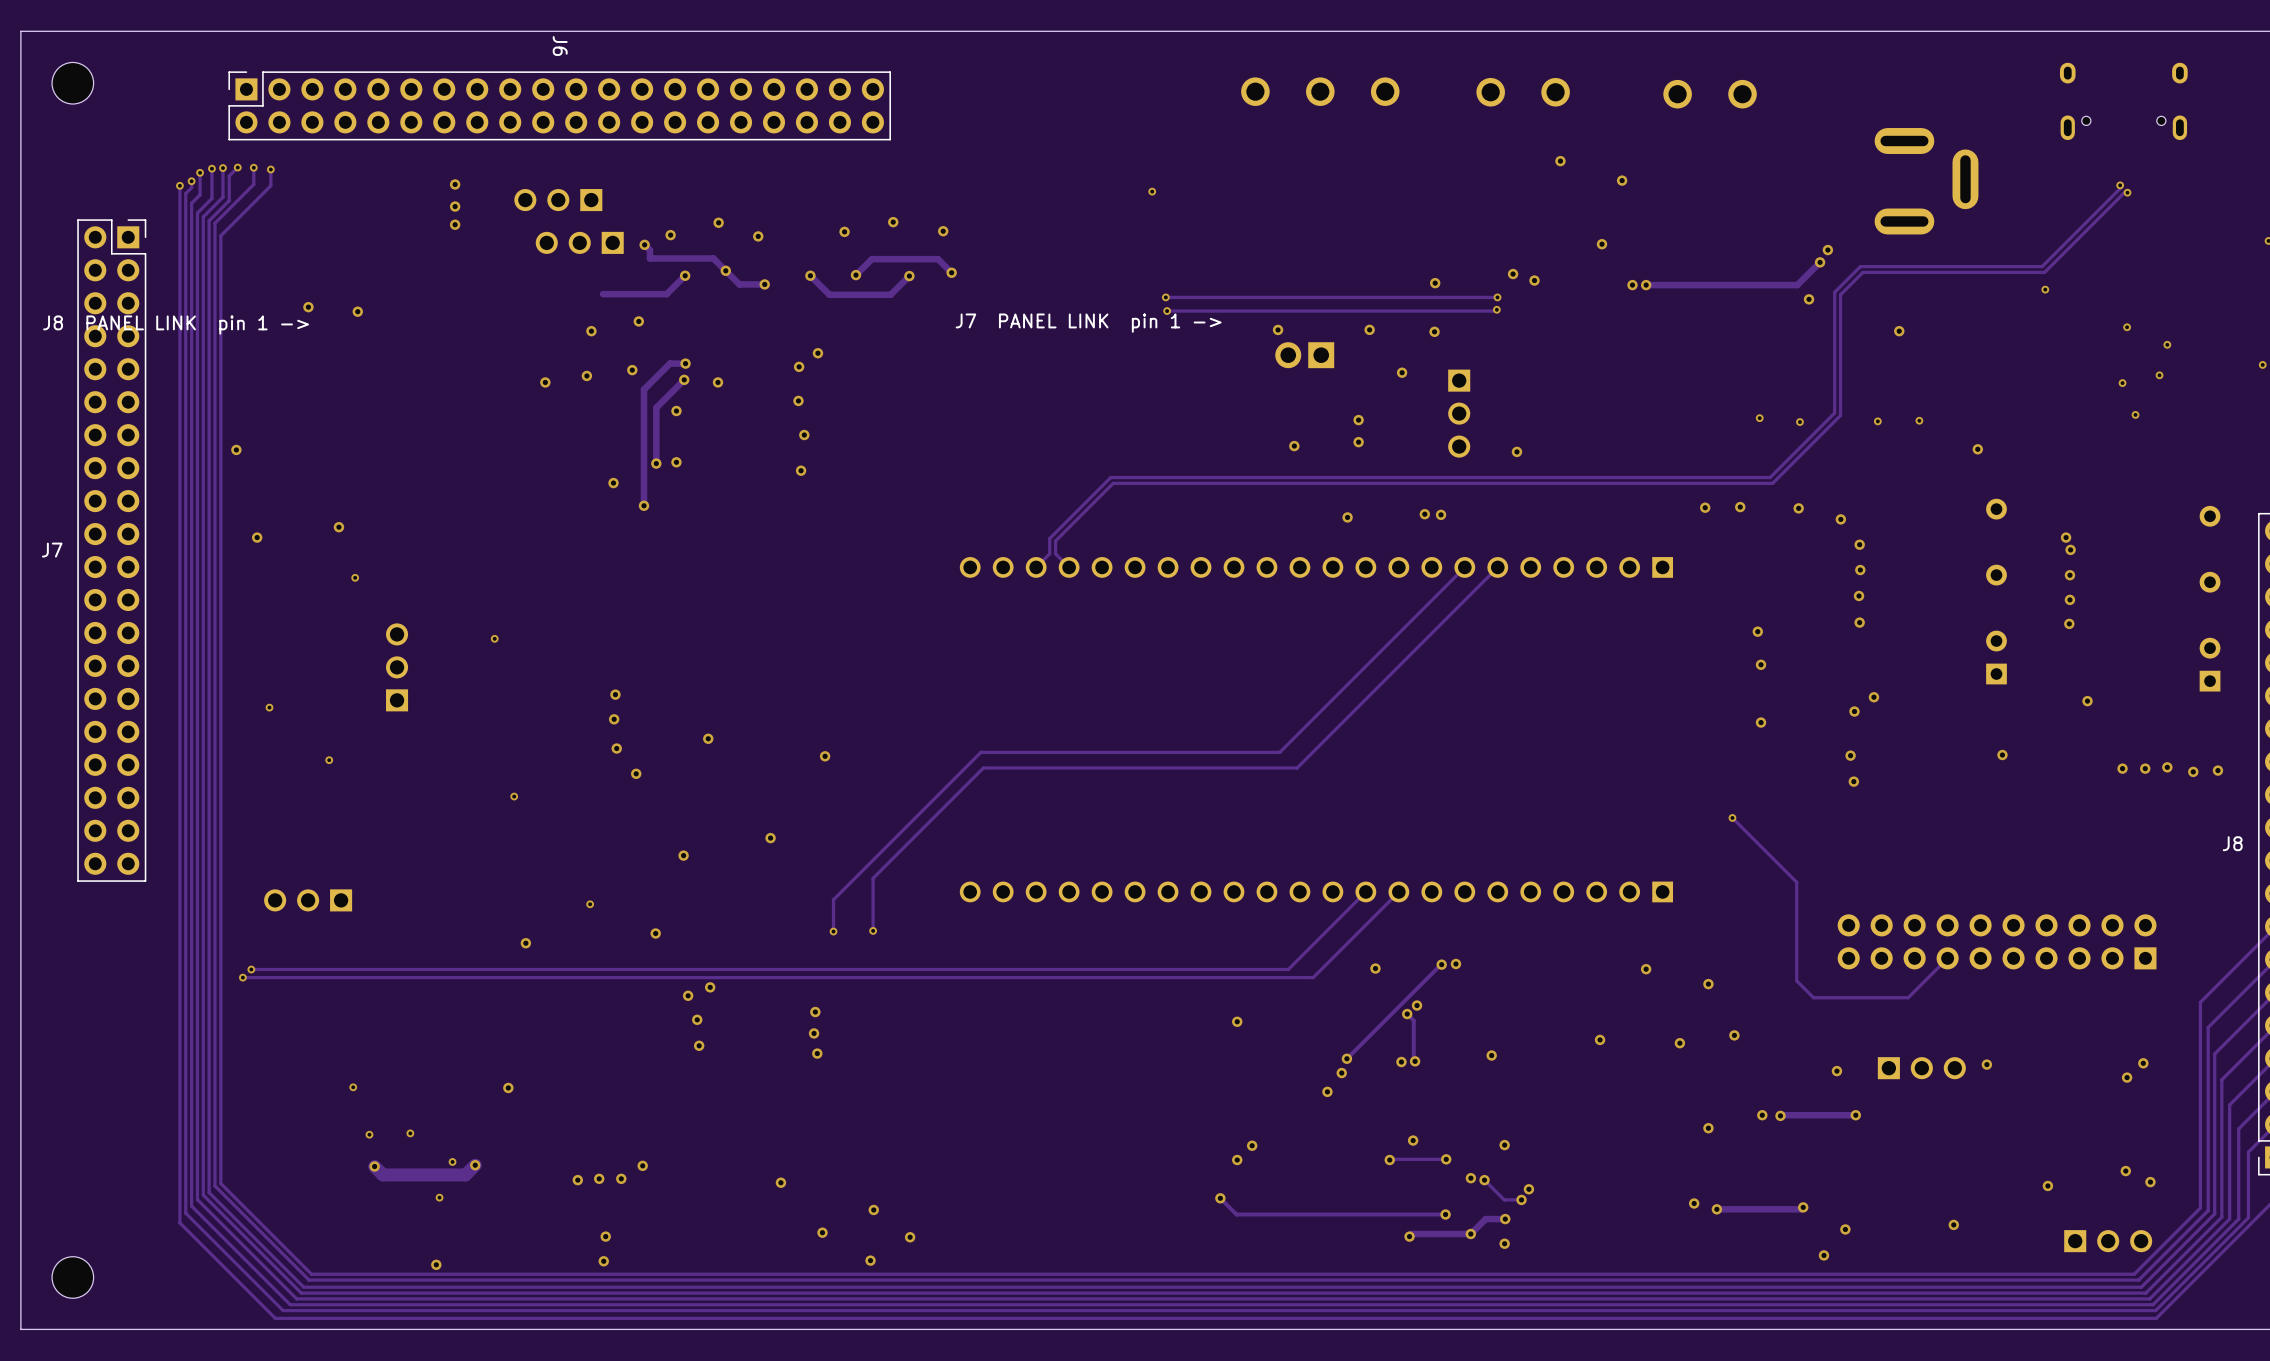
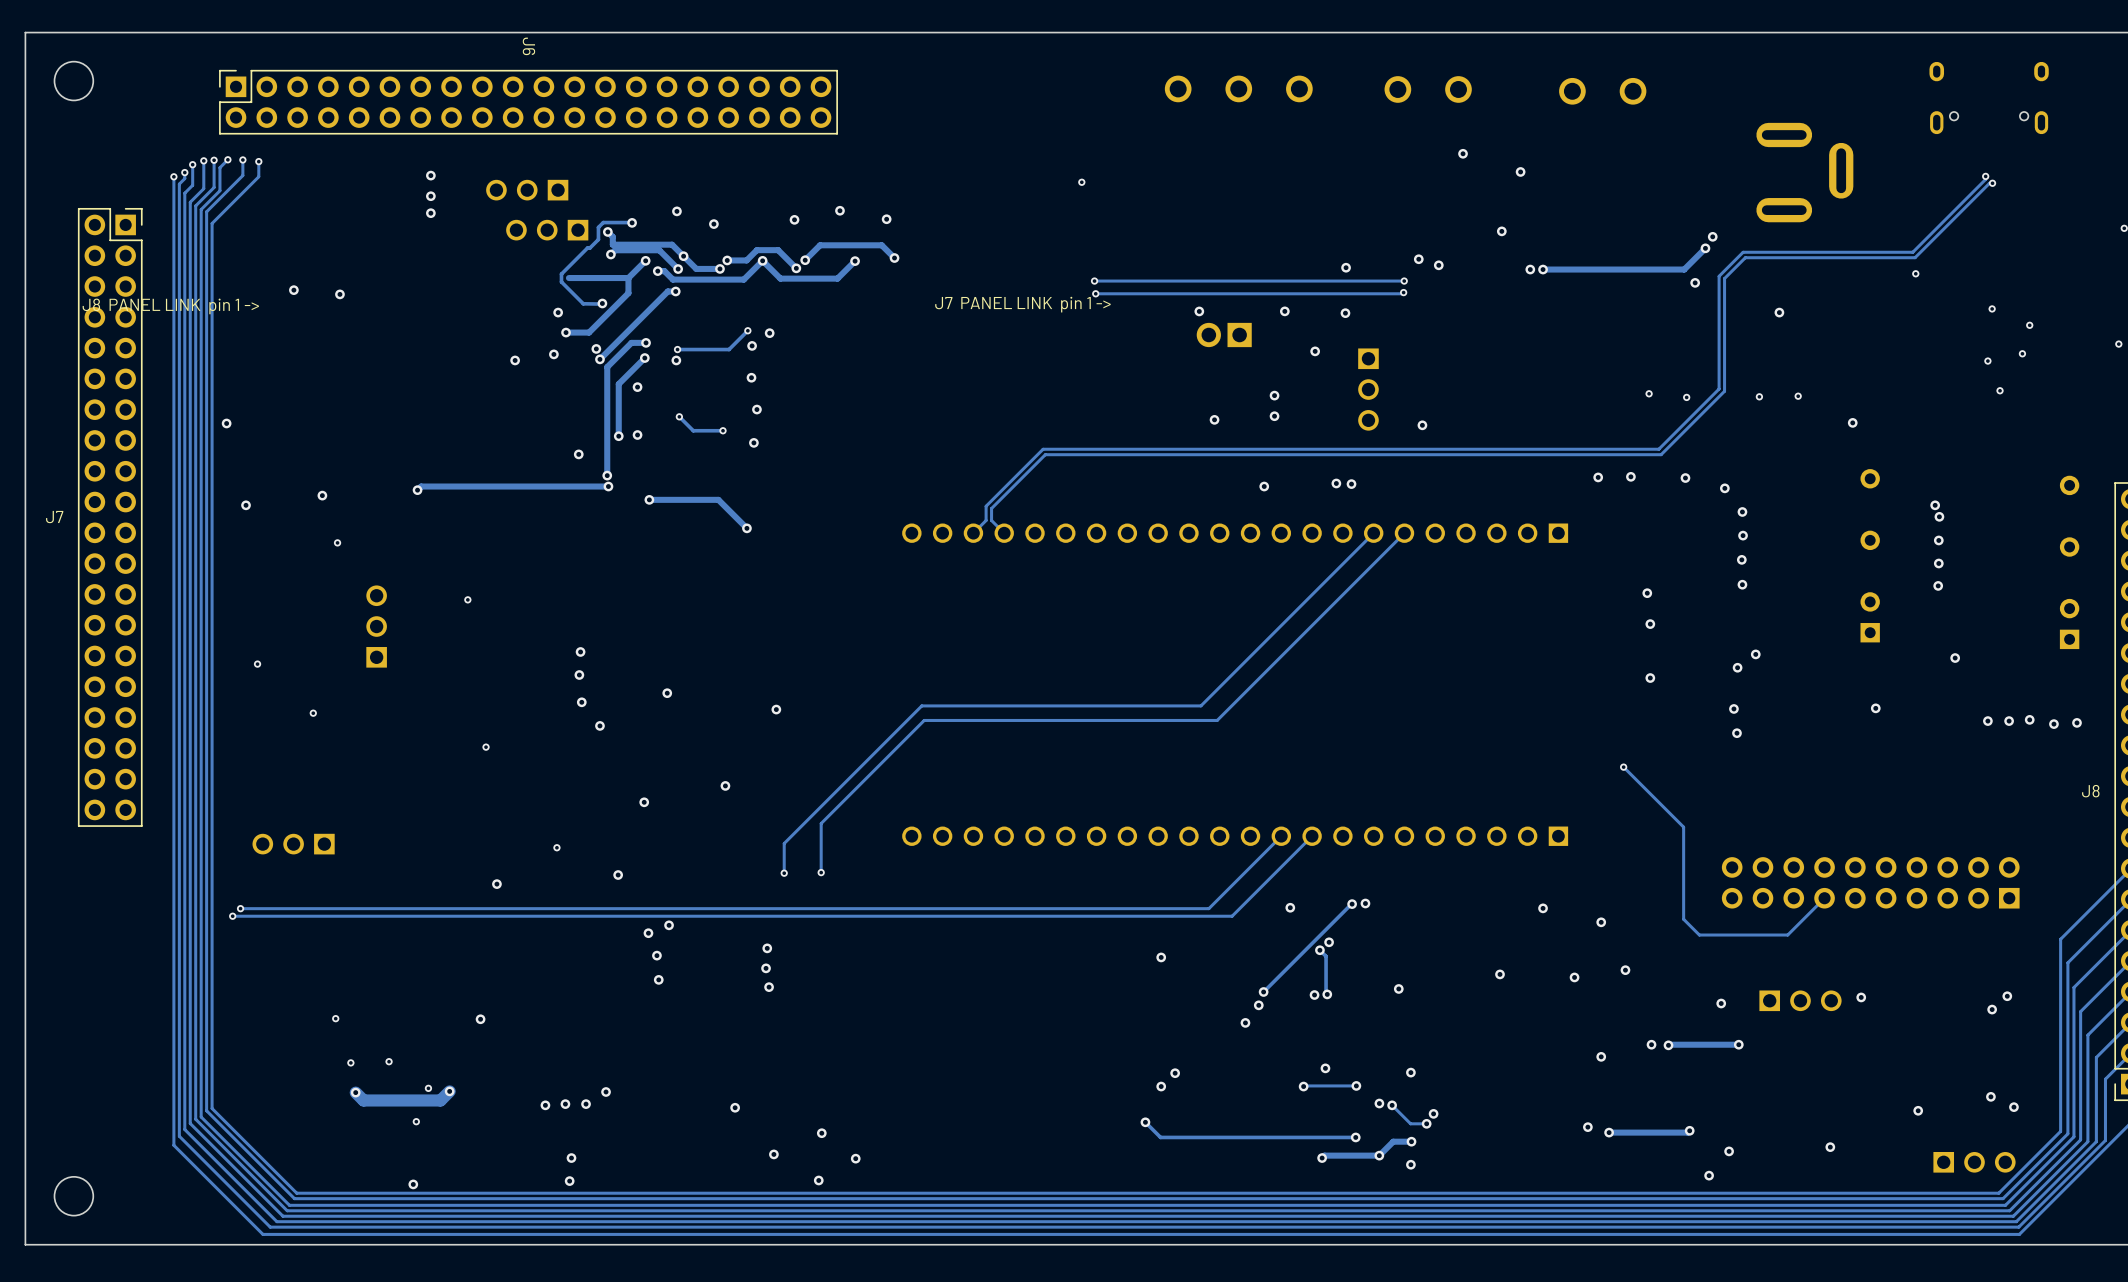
track: none -> (631, 222) (603, 222) (598, 227) (598, 239) (561, 274) (561, 281) (583, 303) (601, 304)
track: none -> (610, 254) (615, 250) (659, 250) (678, 269)
via: none -> (610, 254)
track: none -> (727, 260) (746, 260) (756, 250) (778, 250) (796, 268)
via: none -> (727, 260)
track: none -> (762, 260) (743, 279) (672, 279) (664, 271) (657, 271)
via: none -> (796, 268)
via: none -> (678, 269)
via: none -> (657, 271)
track: none -> (628, 278) (628, 293) (589, 332) (566, 332)
track: none -> (675, 291) (667, 291) (599, 359)
via: none -> (675, 291)
track: none -> (747, 330) (729, 349) (677, 349)
via: none -> (747, 330)
via: none -> (566, 332)
via: none -> (677, 349)
via: none -> (599, 359)
track: none -> (679, 416) (693, 430) (723, 430)
via: none -> (679, 416)
via: none -> (723, 430)
track: none -> (608, 486) (421, 486) (417, 490)
via: none -> (608, 486)
via: none -> (417, 490)
track: none -> (649, 499) (718, 499) (746, 528)
via: none -> (649, 499)
via: none -> (746, 528)

